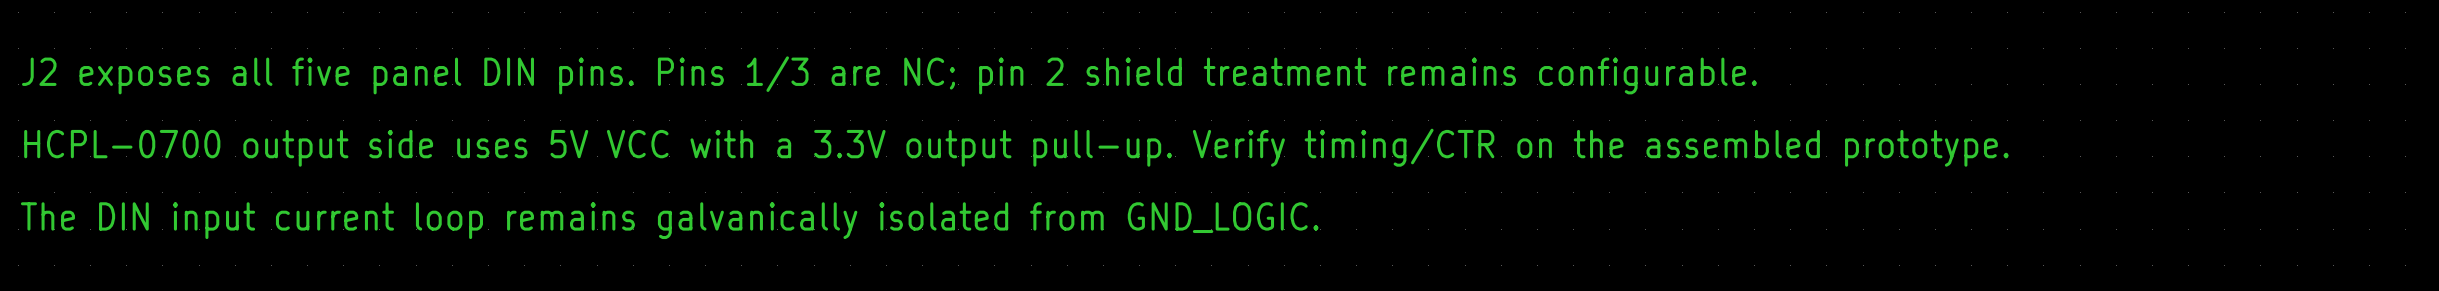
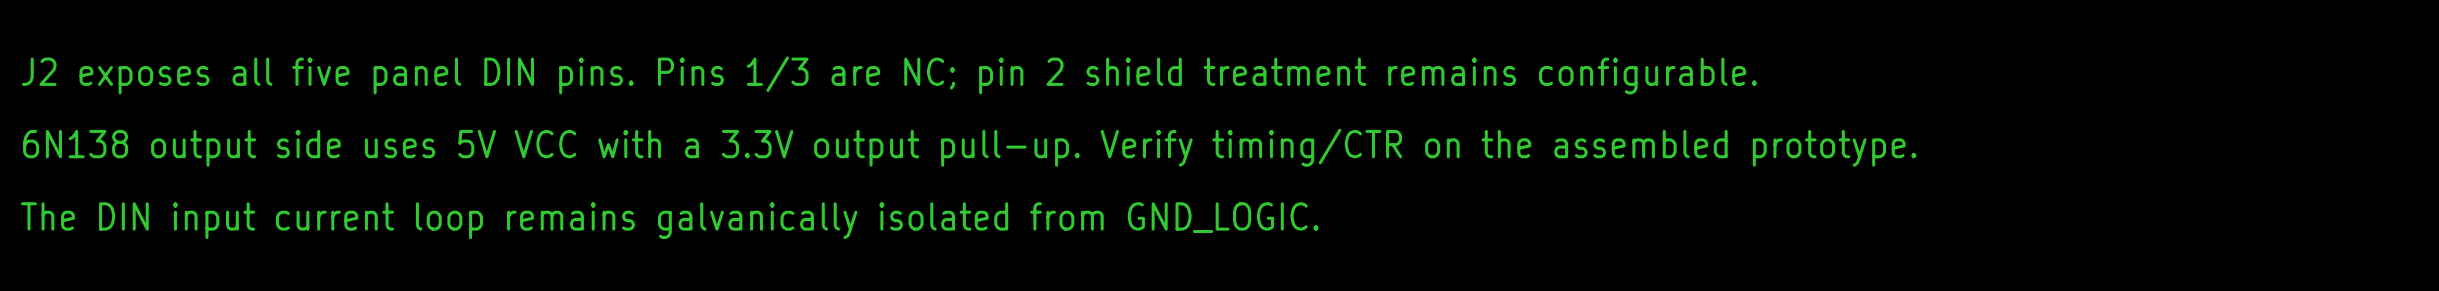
text: HCPL-0700 output side uses 5V VCC with a 3.3V output pull-up. Verify timing/CTR on the assembled prototype. (1016, 147) -> 6N138 output side uses 5V VCC with a 3.3V output pull-up. Verify timing/CTR on the assembled prototype. (969, 147)

